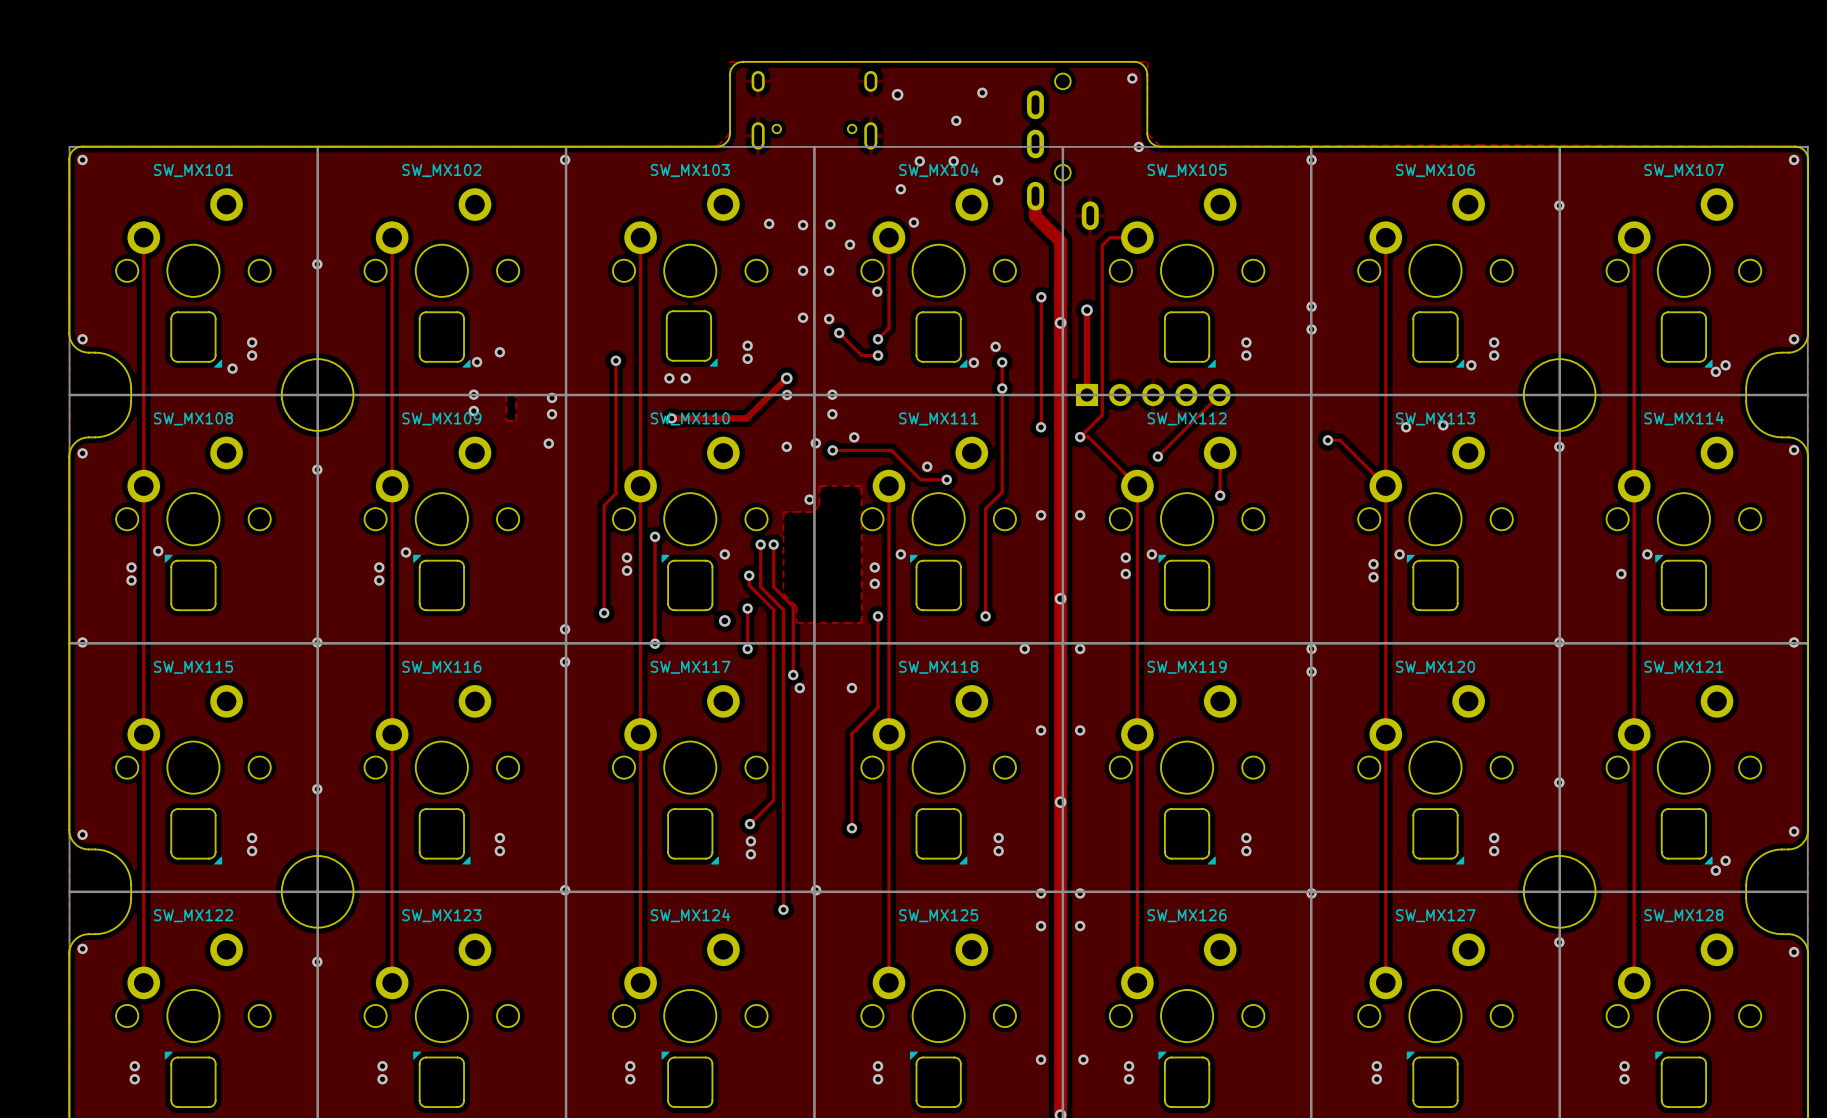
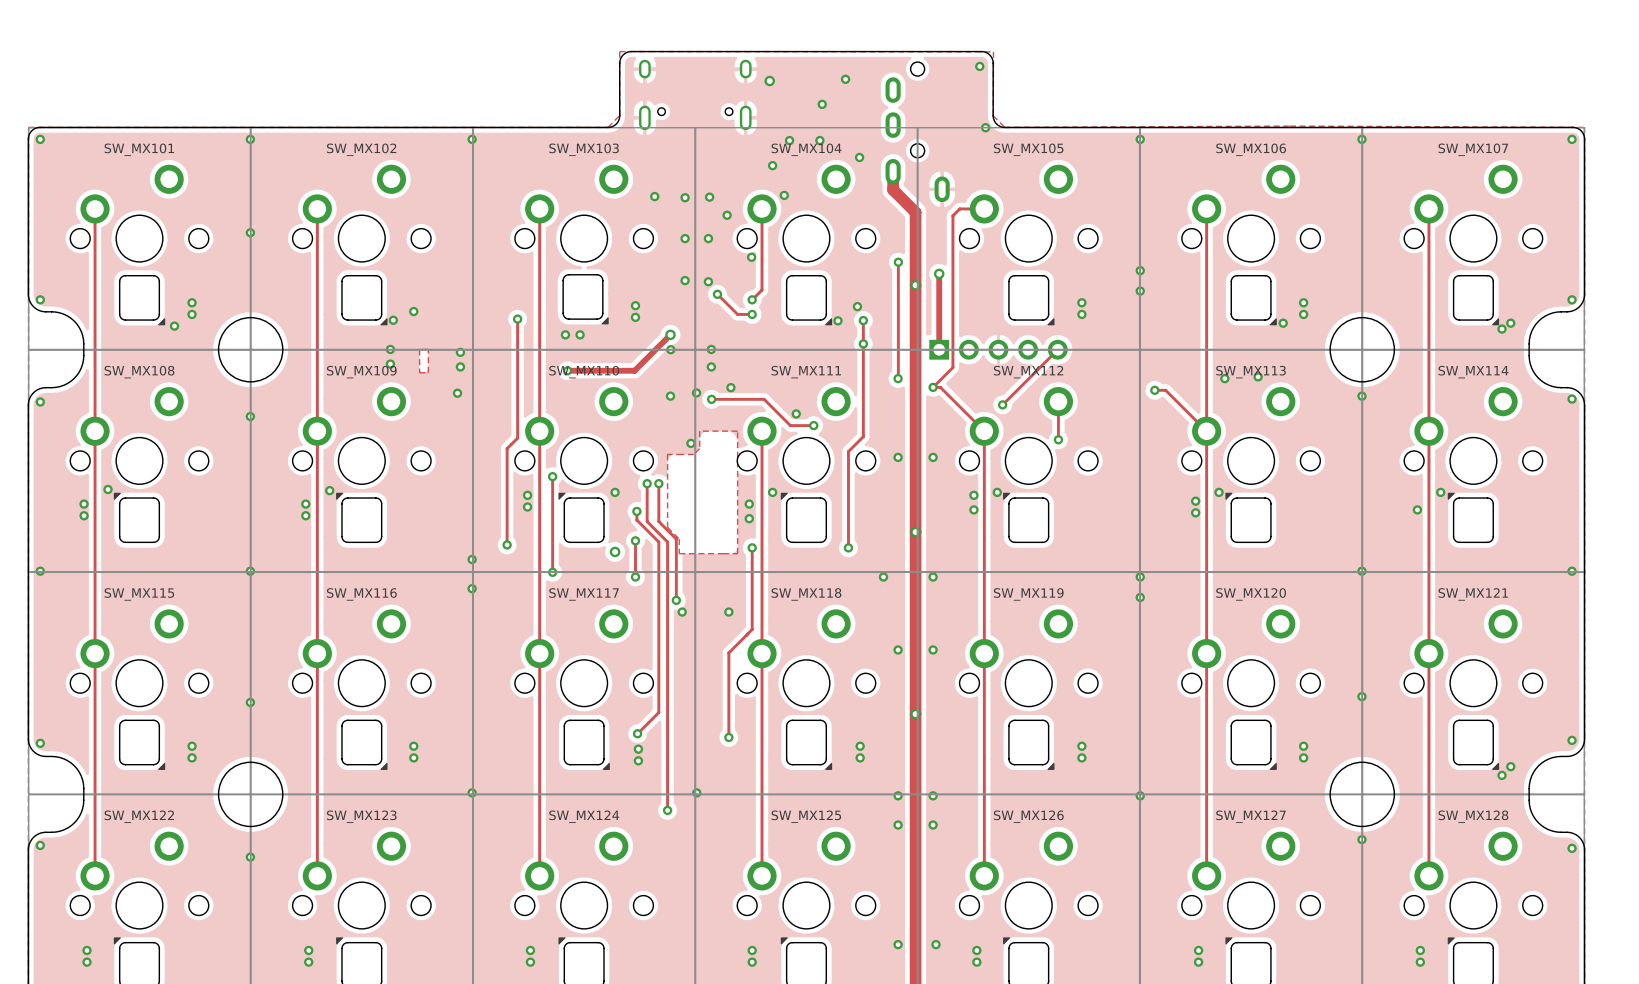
via: none -> (250, 139)
via position: (1559, 205) -> (1361, 139)

